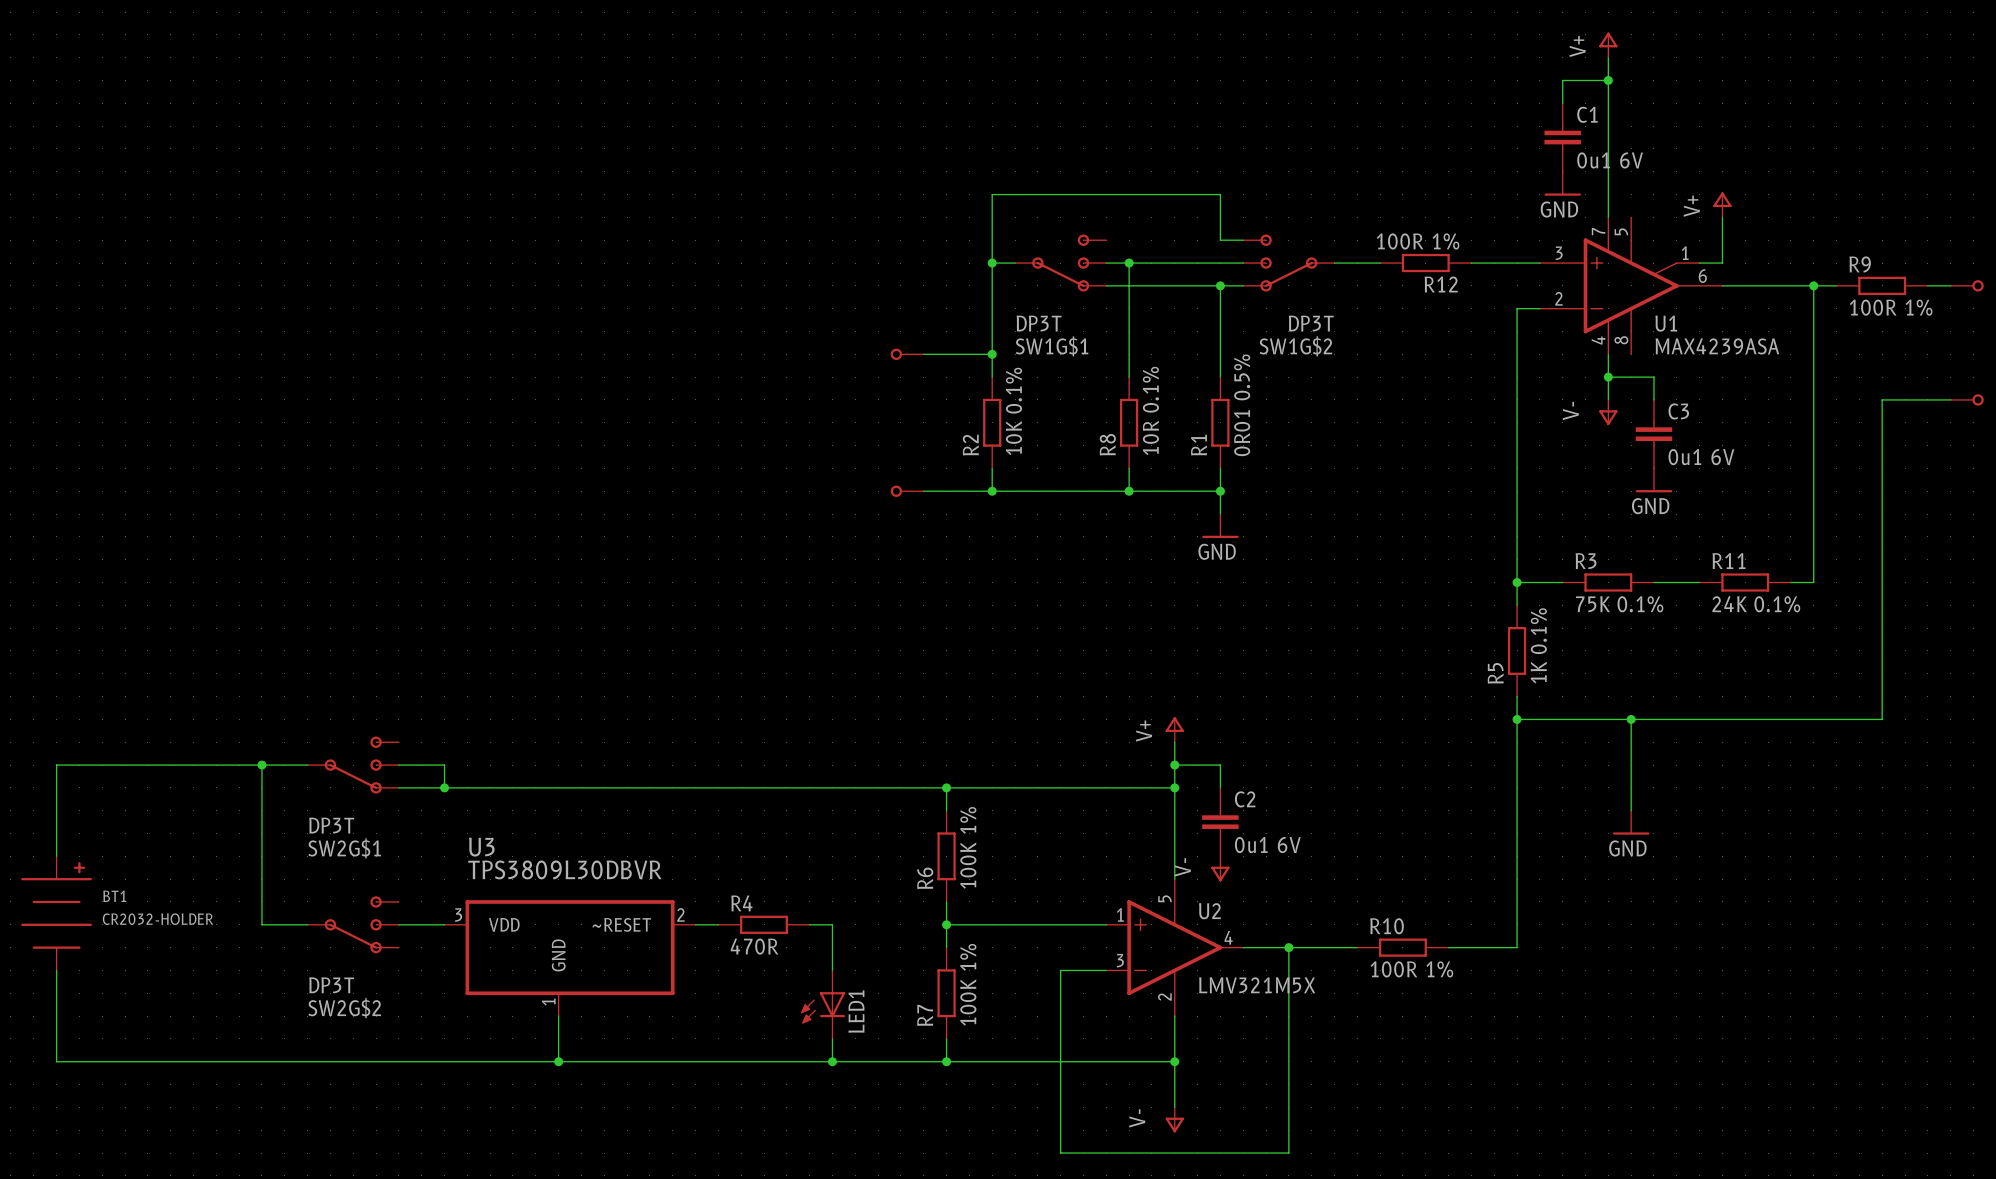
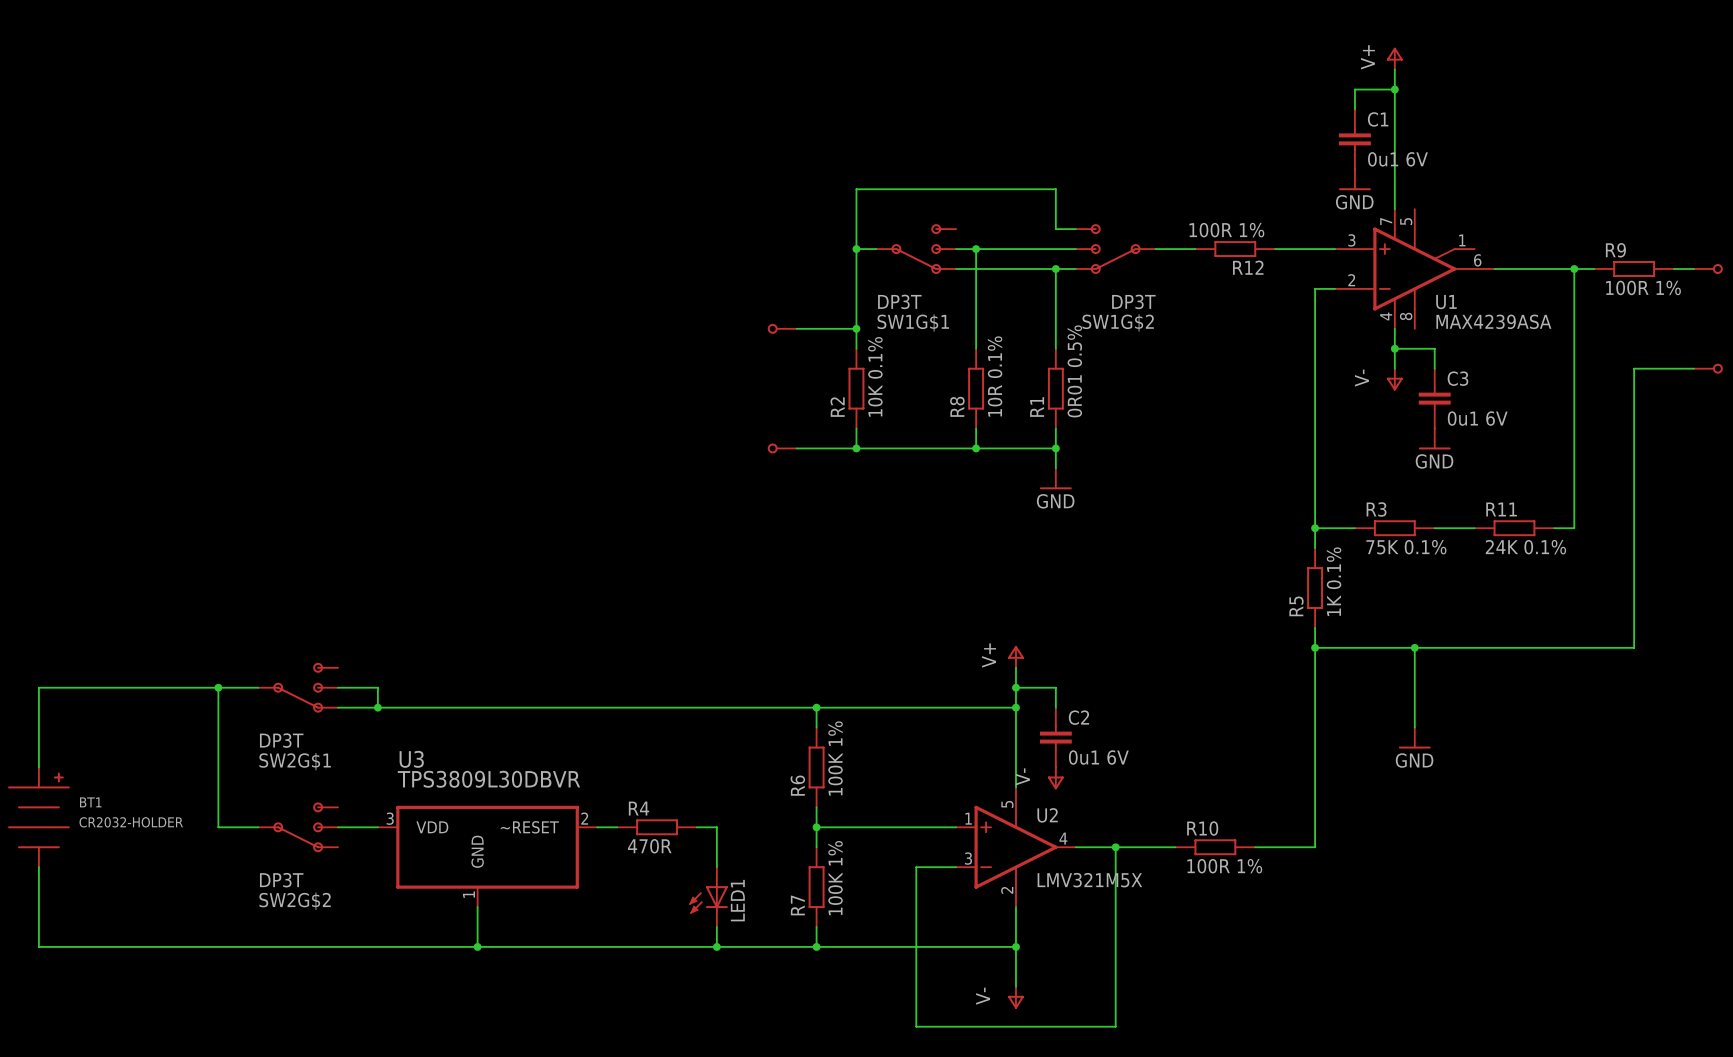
power symbol: V+ (1722, 204) -> none
wire: (1722, 217) (1722, 263) (1699, 263) -> none

